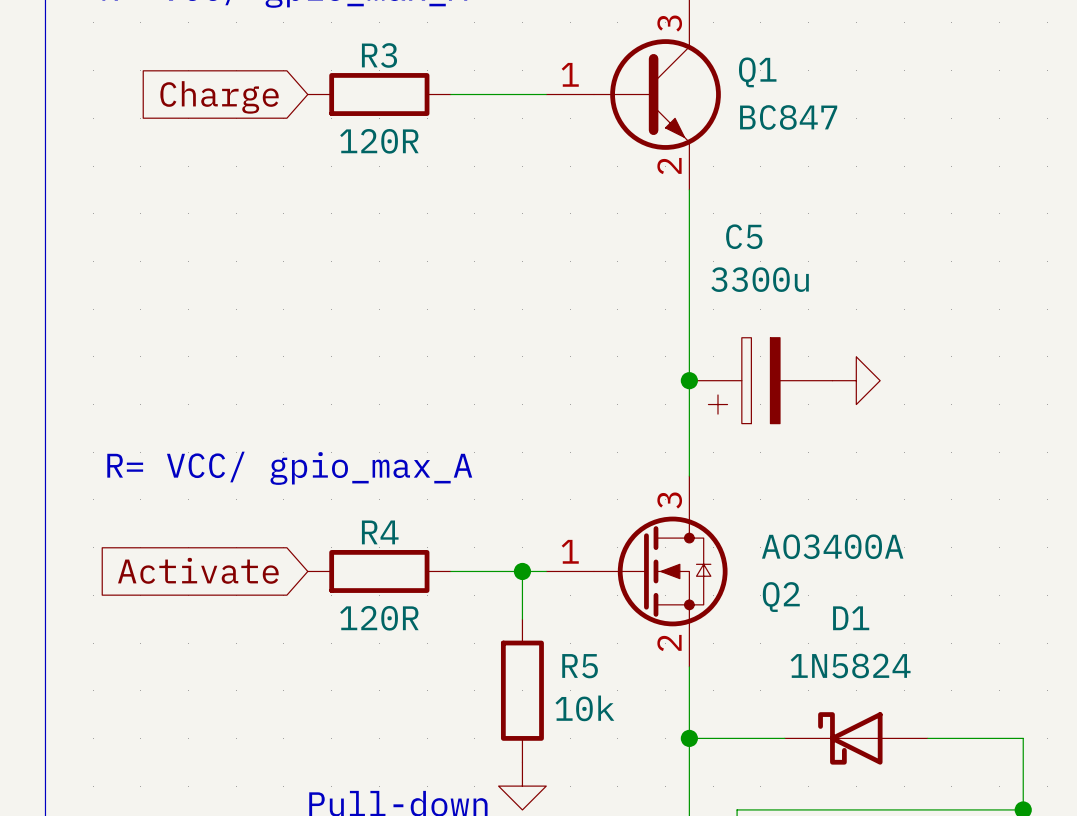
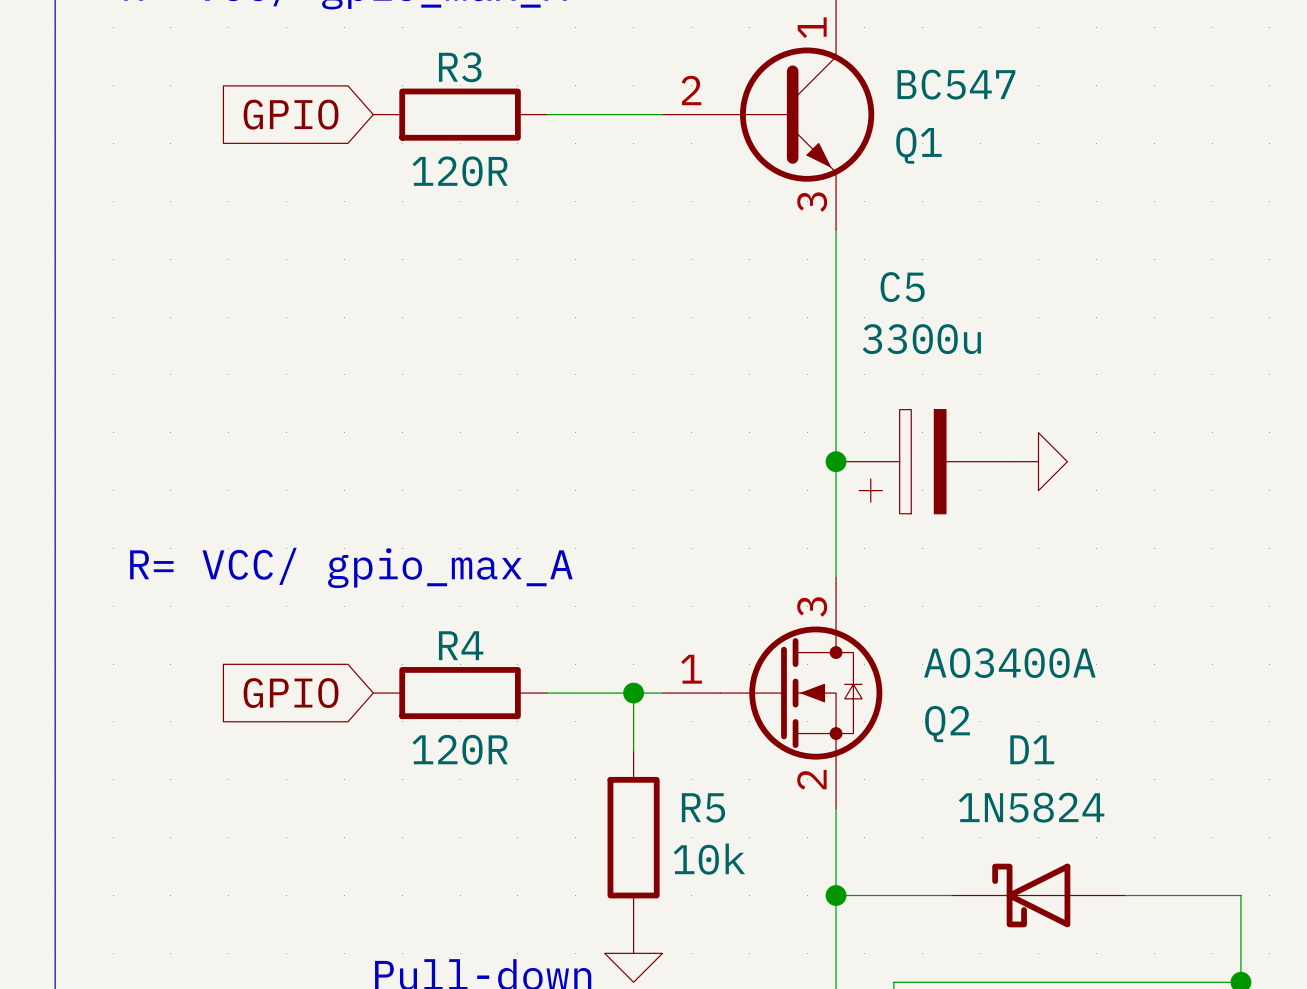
Q1 pin number: 3 (669, 23) -> 1 (812, 27)
Q1 name position: Q1 (757, 72) -> Q1 (918, 145)
Q1 pin number: 1 (570, 74) -> 2 (691, 90)
global label: Charge (219, 97) -> GPIO (291, 114)
Q1 value: BC847 (788, 117) -> BC547 (956, 84)
Q1 pin number: 2 (669, 166) -> 3 (812, 202)
global label: Activate (198, 570) -> GPIO (291, 693)

